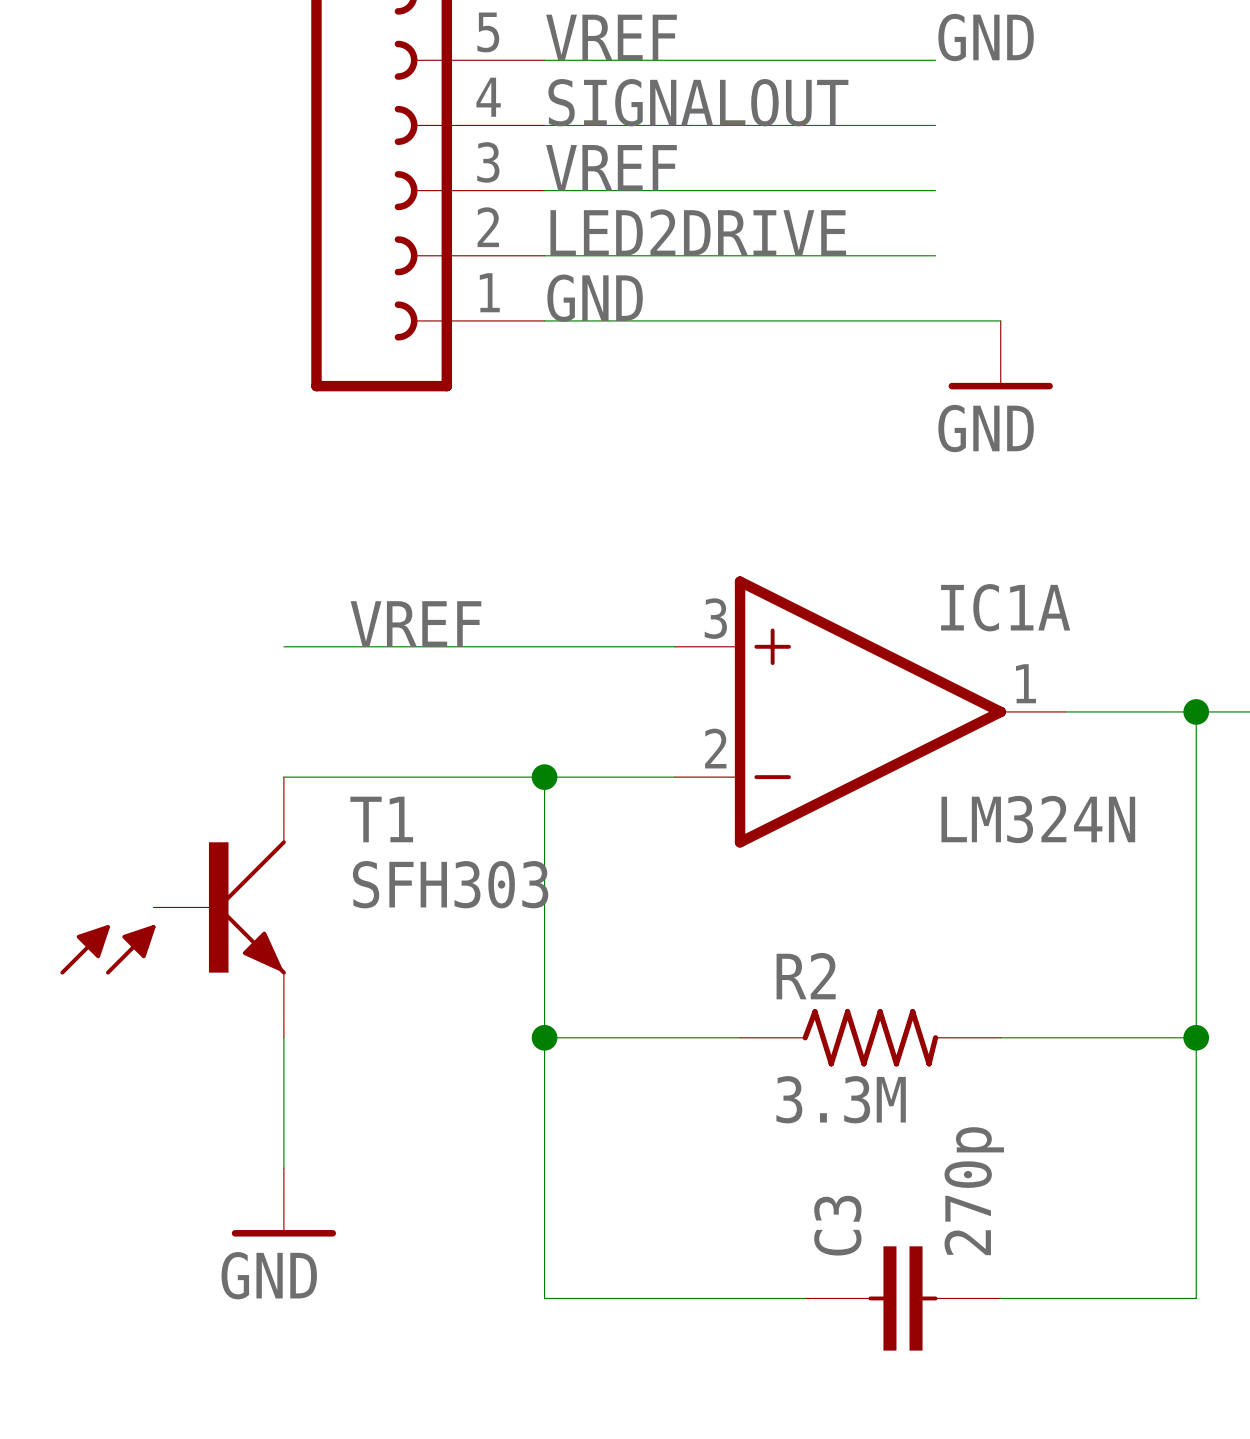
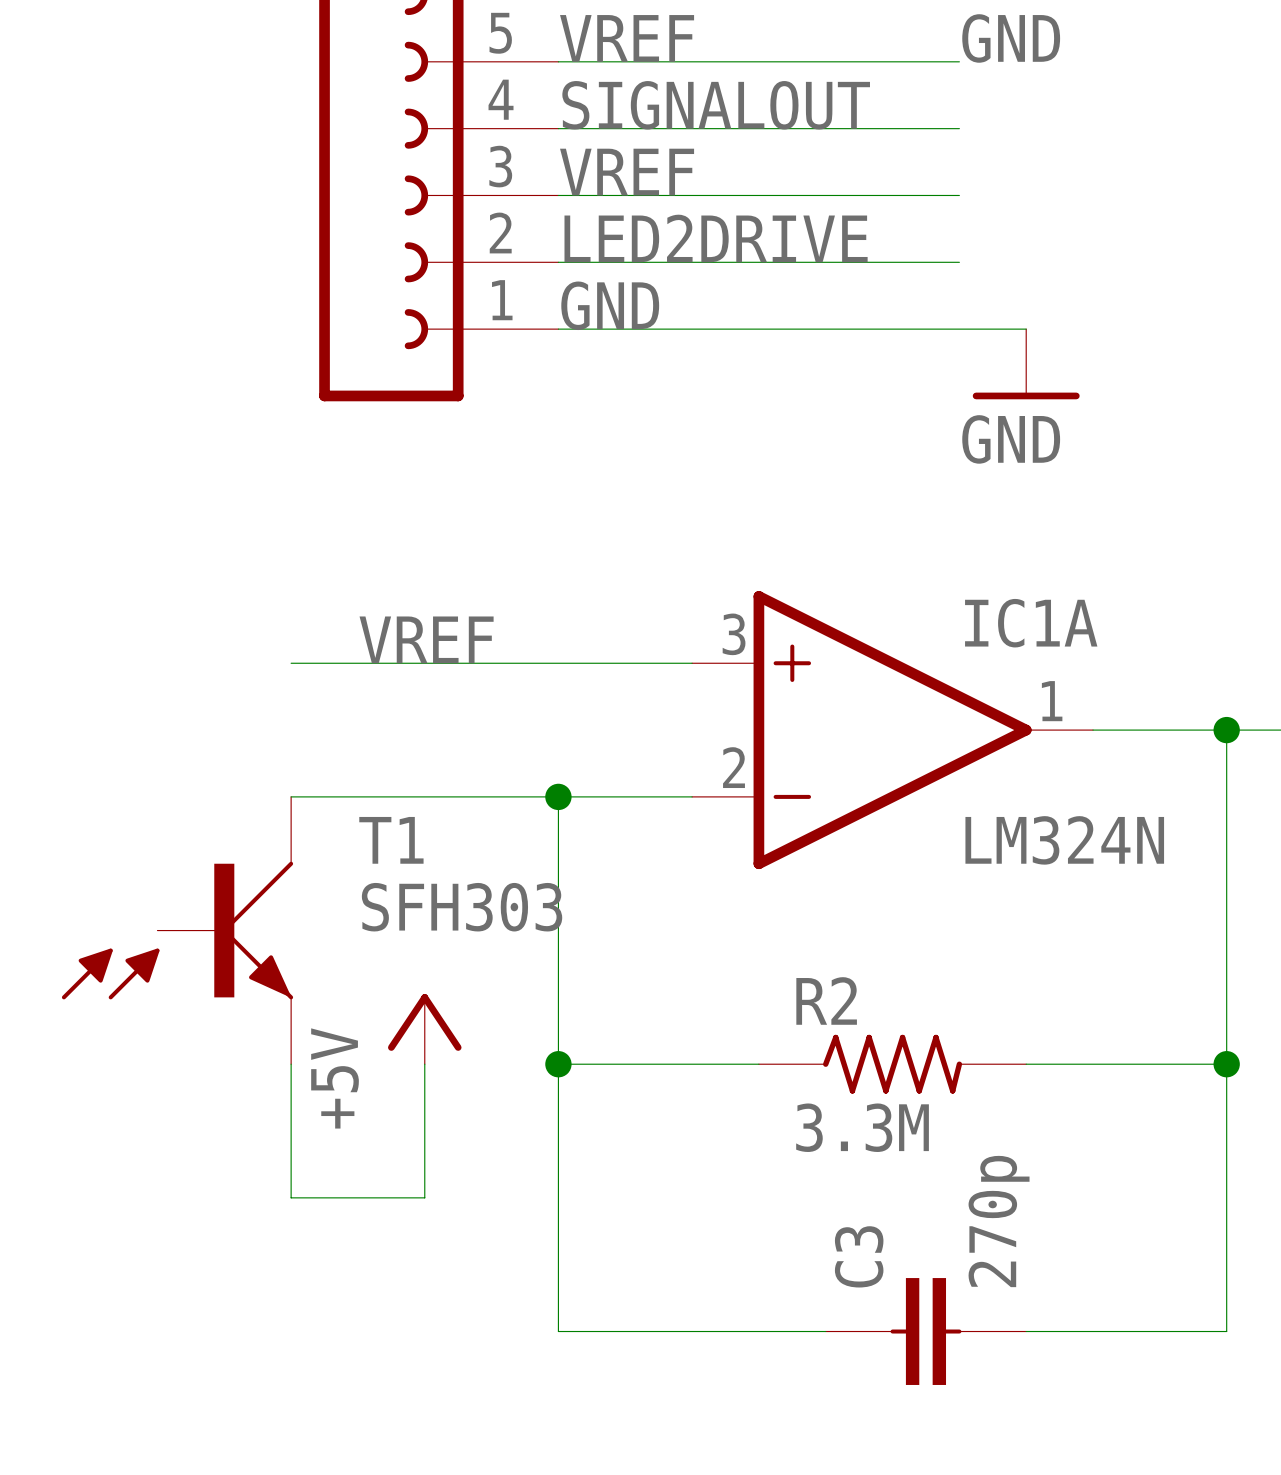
power symbol: none -> +5V (424, 1029)
wire: none -> (424, 1064) (424, 1197) (291, 1197)
power symbol: GND (283, 1202) -> none

